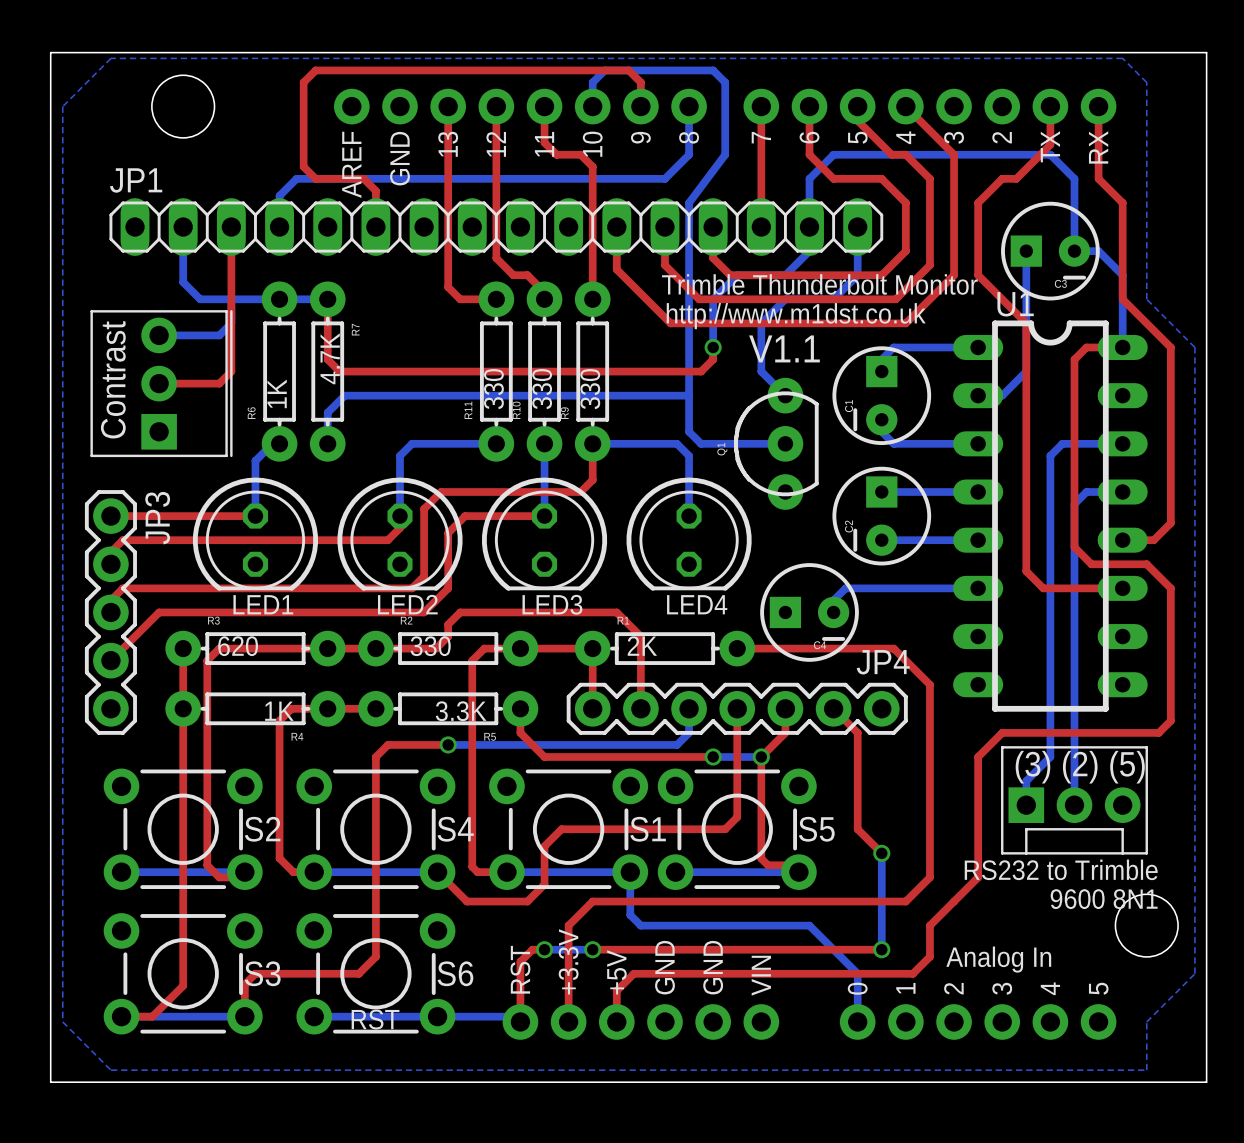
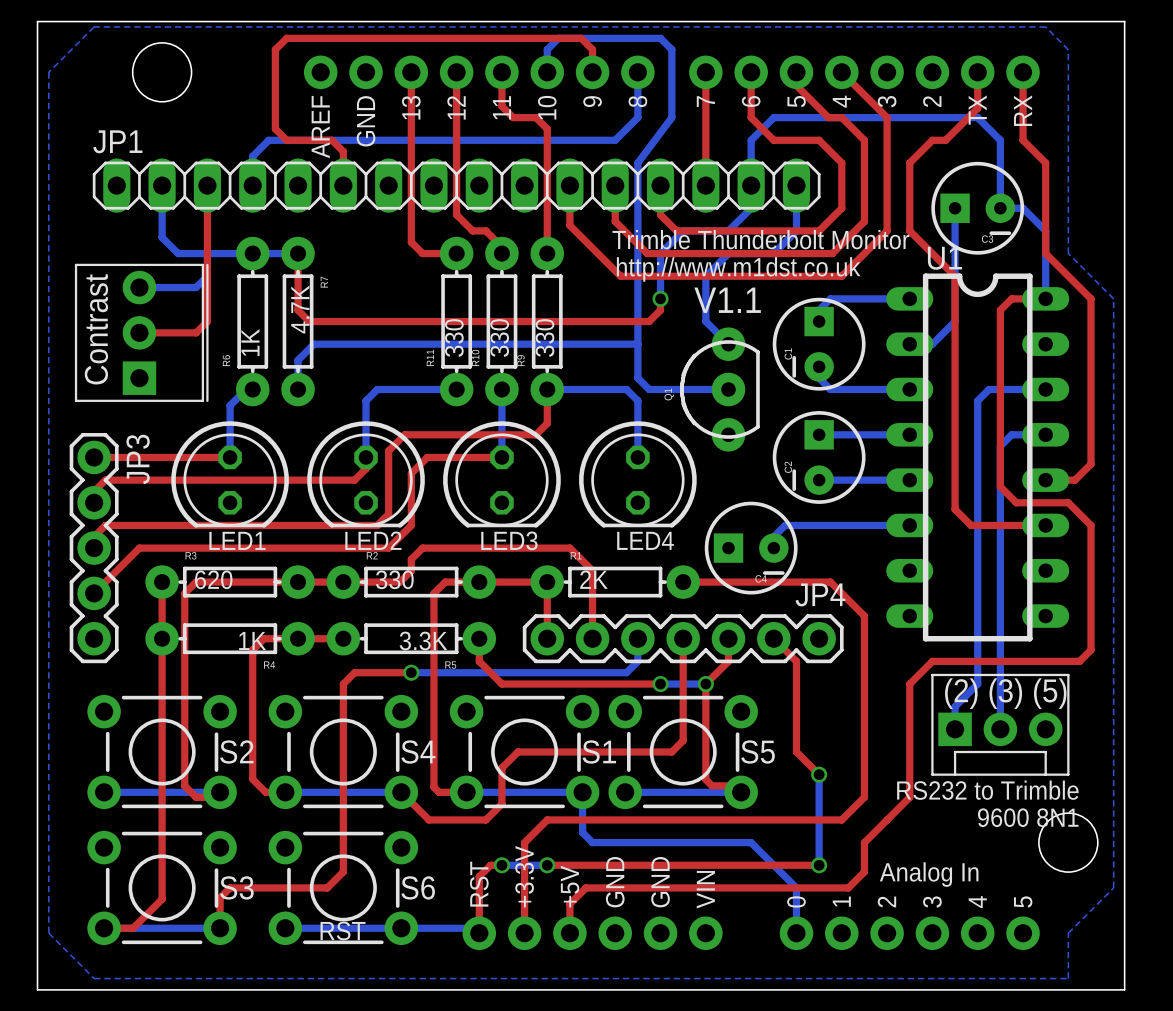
text: (3) (2) (5) (1080, 767) -> (2) (3) (5) (1005, 693)

